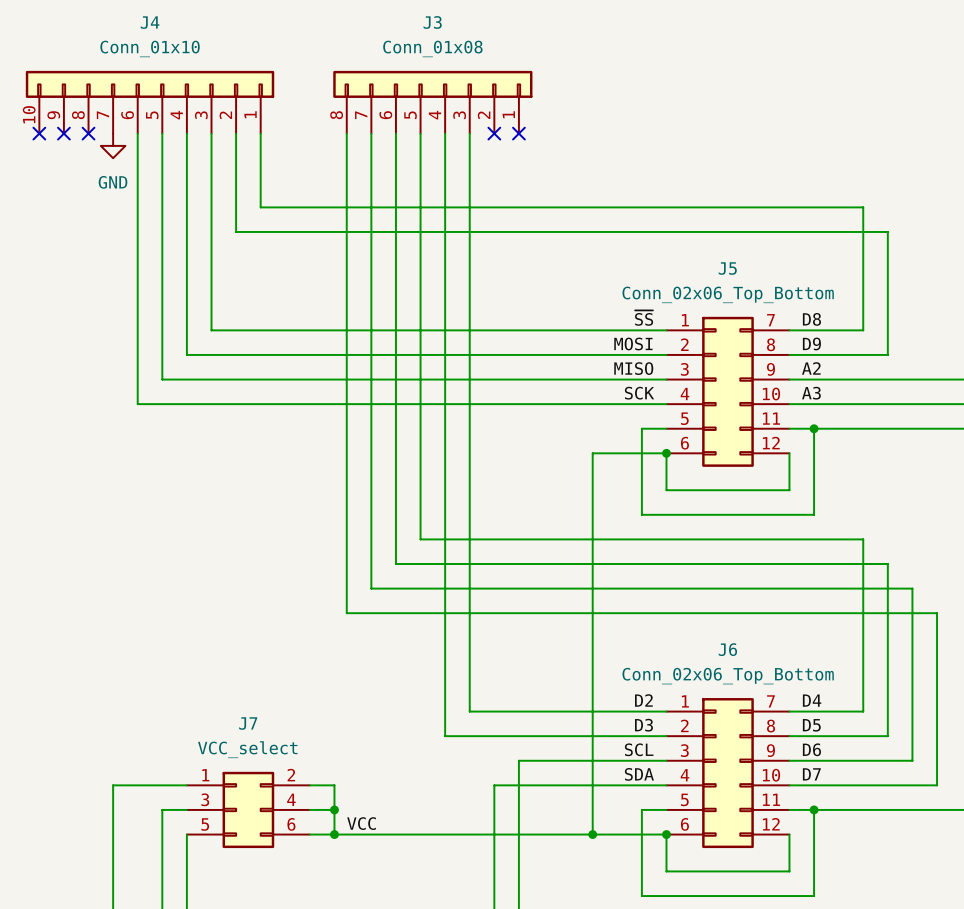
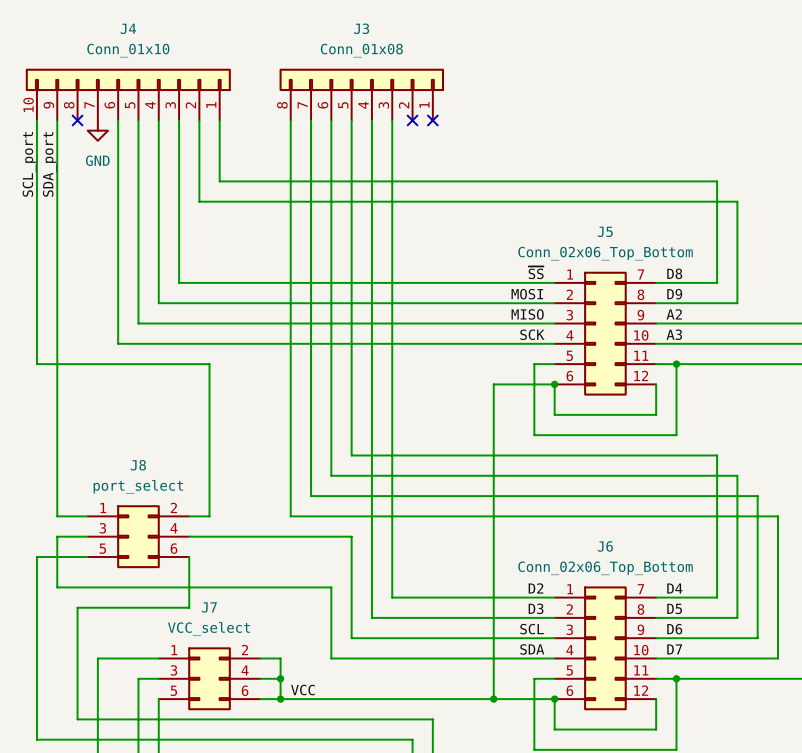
wire: none -> (36, 120) (36, 364) (209, 364) (209, 516) (189, 516)
no-connect mark: (39, 133) -> none
wire: none -> (57, 120) (57, 516) (87, 516)
no-connect mark: (63, 133) -> none
label: none -> SCL_port (29, 164)
label: none -> SDA_port (49, 164)
wire: none -> (87, 536) (57, 536) (57, 587) (331, 587) (331, 658) (412, 658)
J8: none -> port_select (138, 536)
wire: none -> (189, 536) (351, 536) (351, 638) (432, 638)
wire: (518, 760) (518, 859) -> (189, 556) (189, 607) (77, 607) (77, 719) (432, 719)
wire: (494, 785) (494, 883) -> (87, 556) (36, 556) (36, 739) (412, 739)

